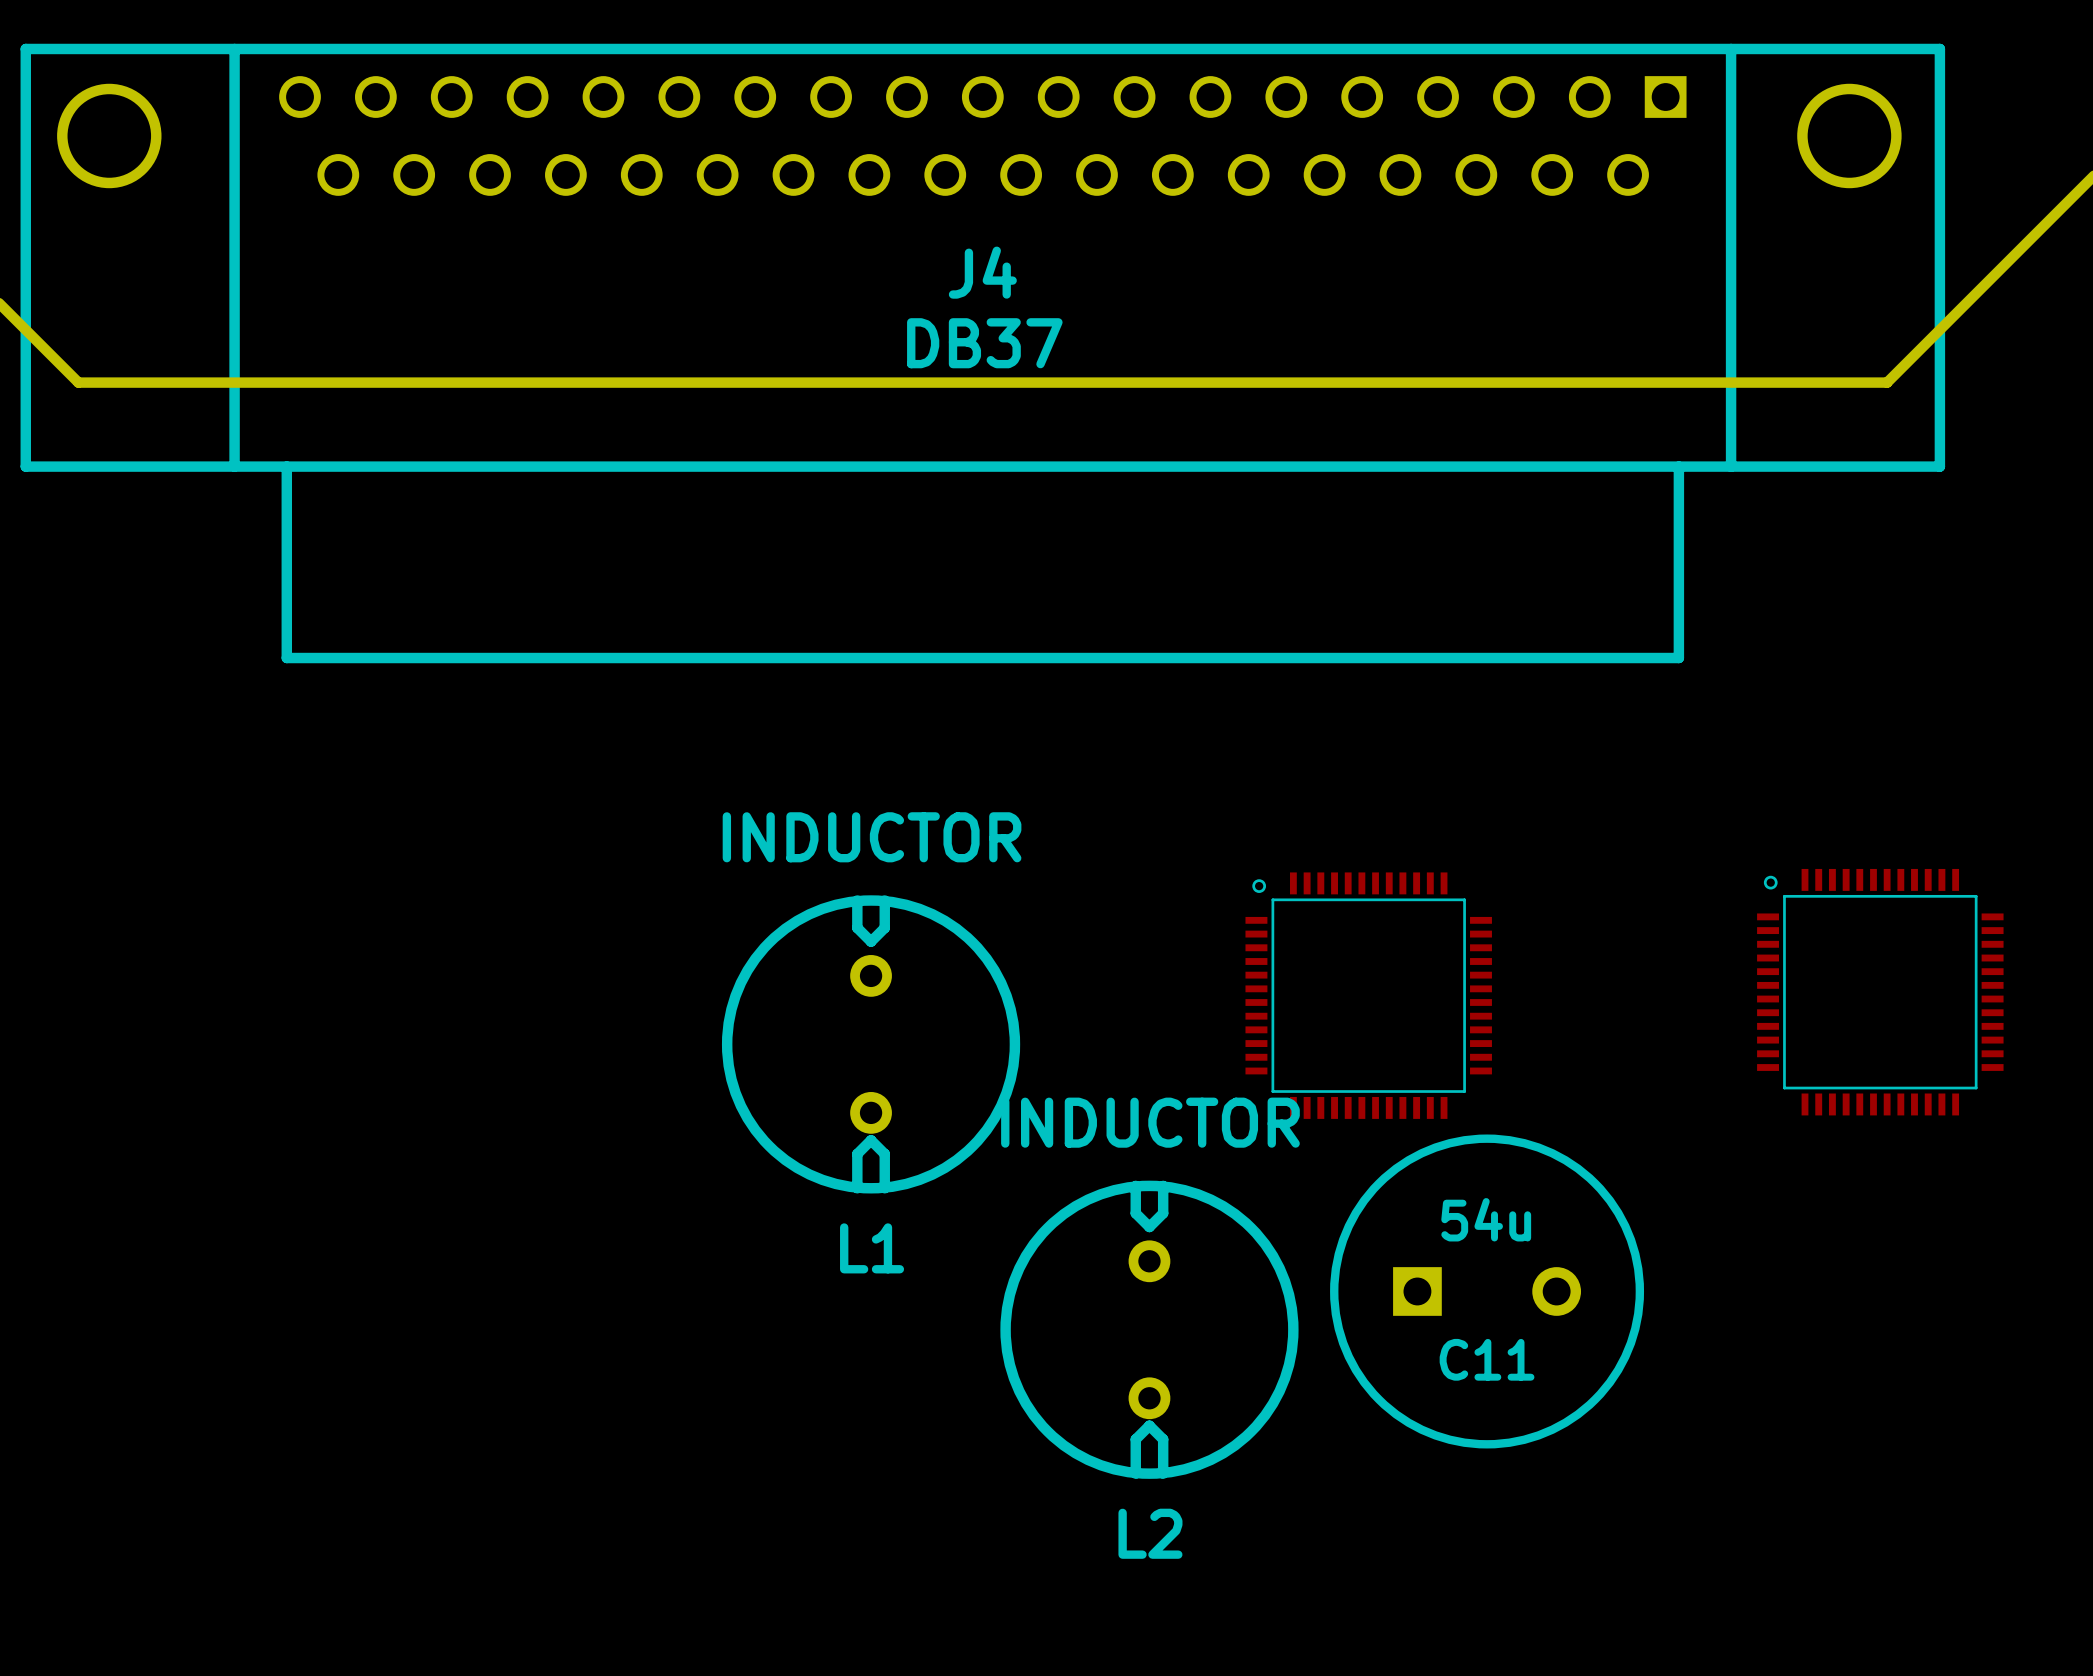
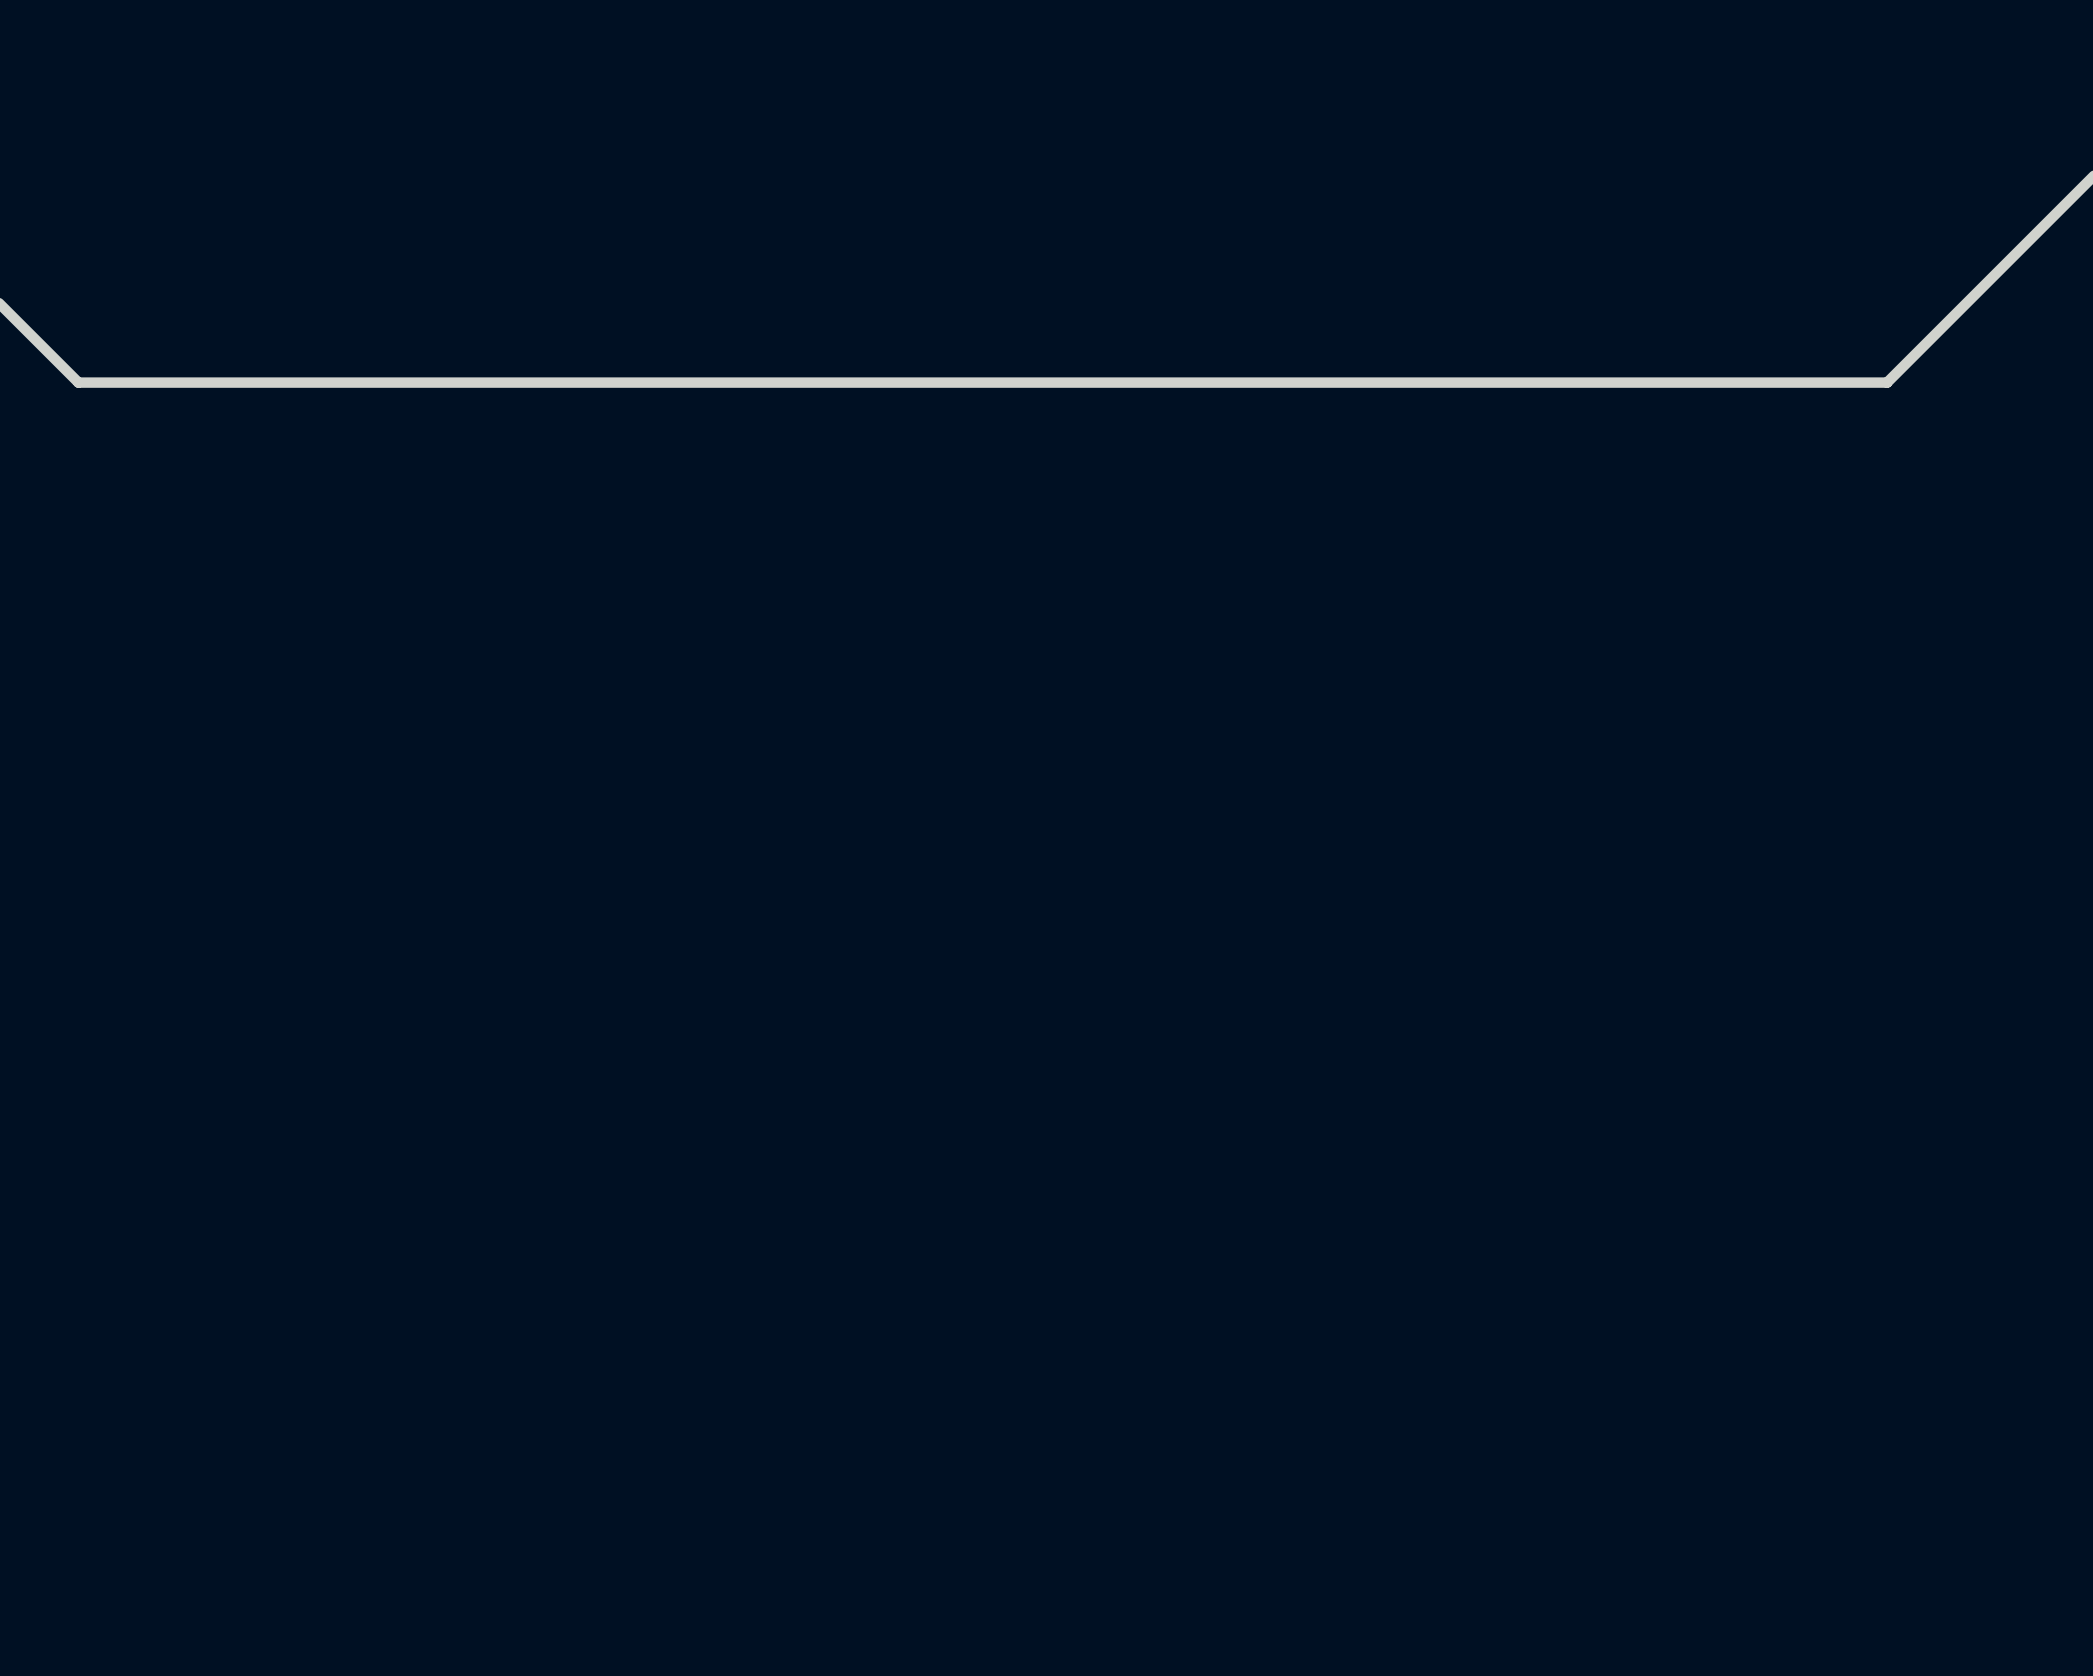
J4: DB37 (982, 353) -> none
part: (1880, 992) -> none
part: (1368, 995) -> none
L1: INDUCTOR (871, 1044) -> none
C11: 54u (1487, 1291) -> none
L2: INDUCTOR (1149, 1329) -> none

